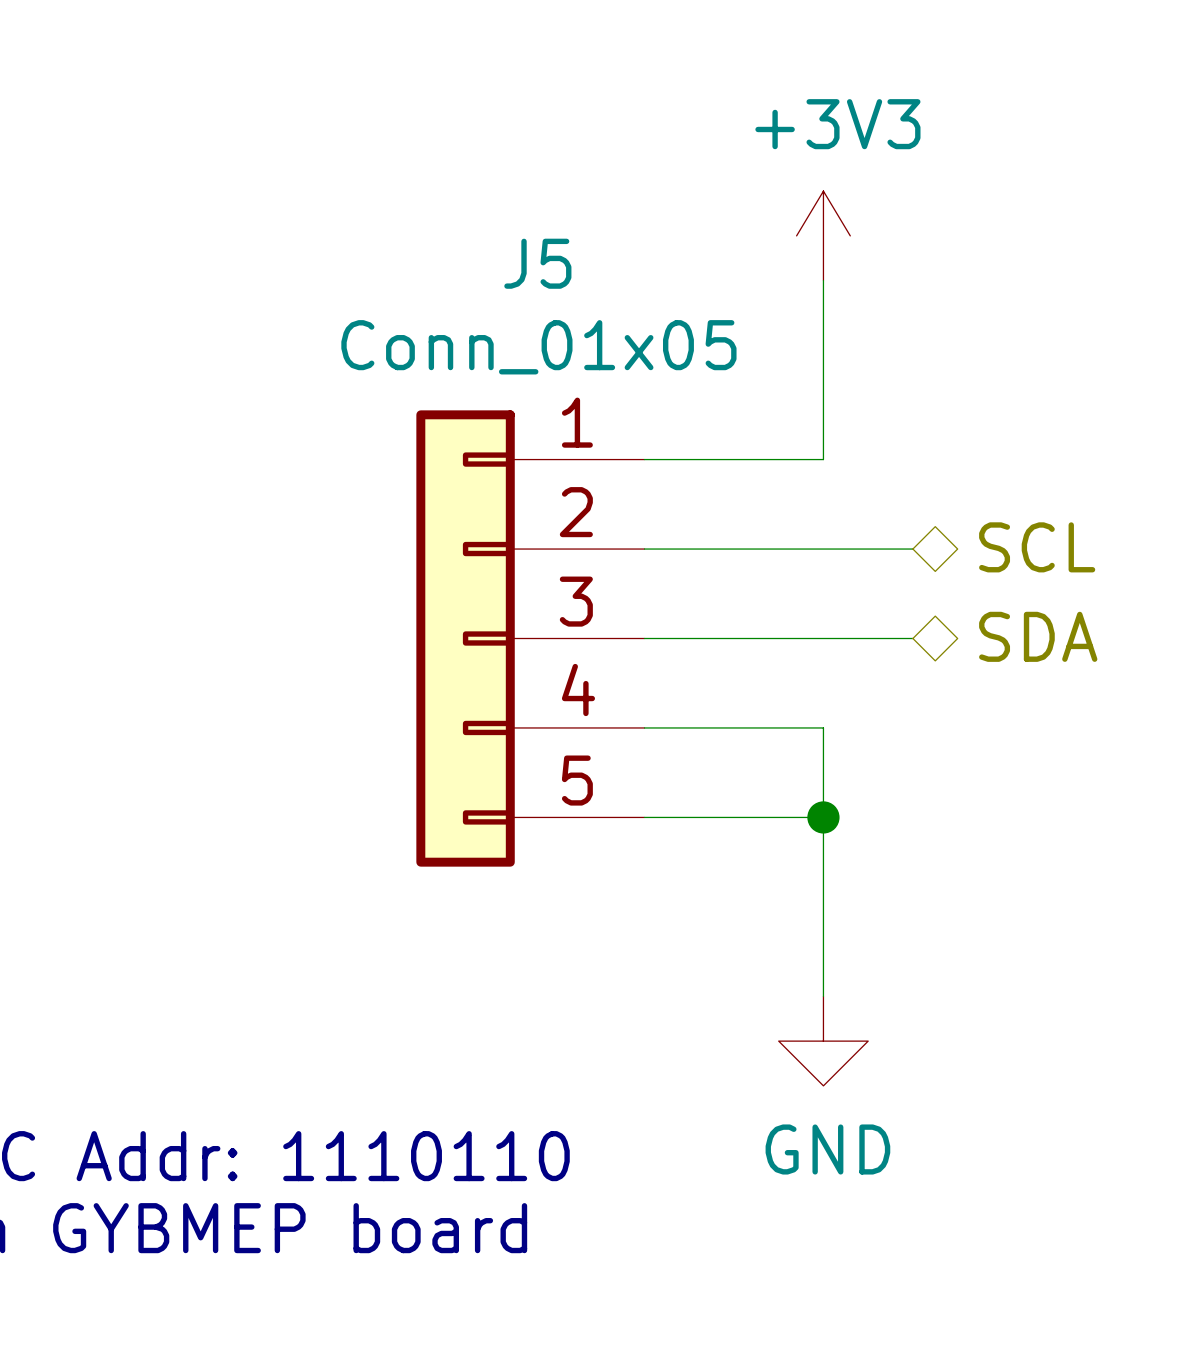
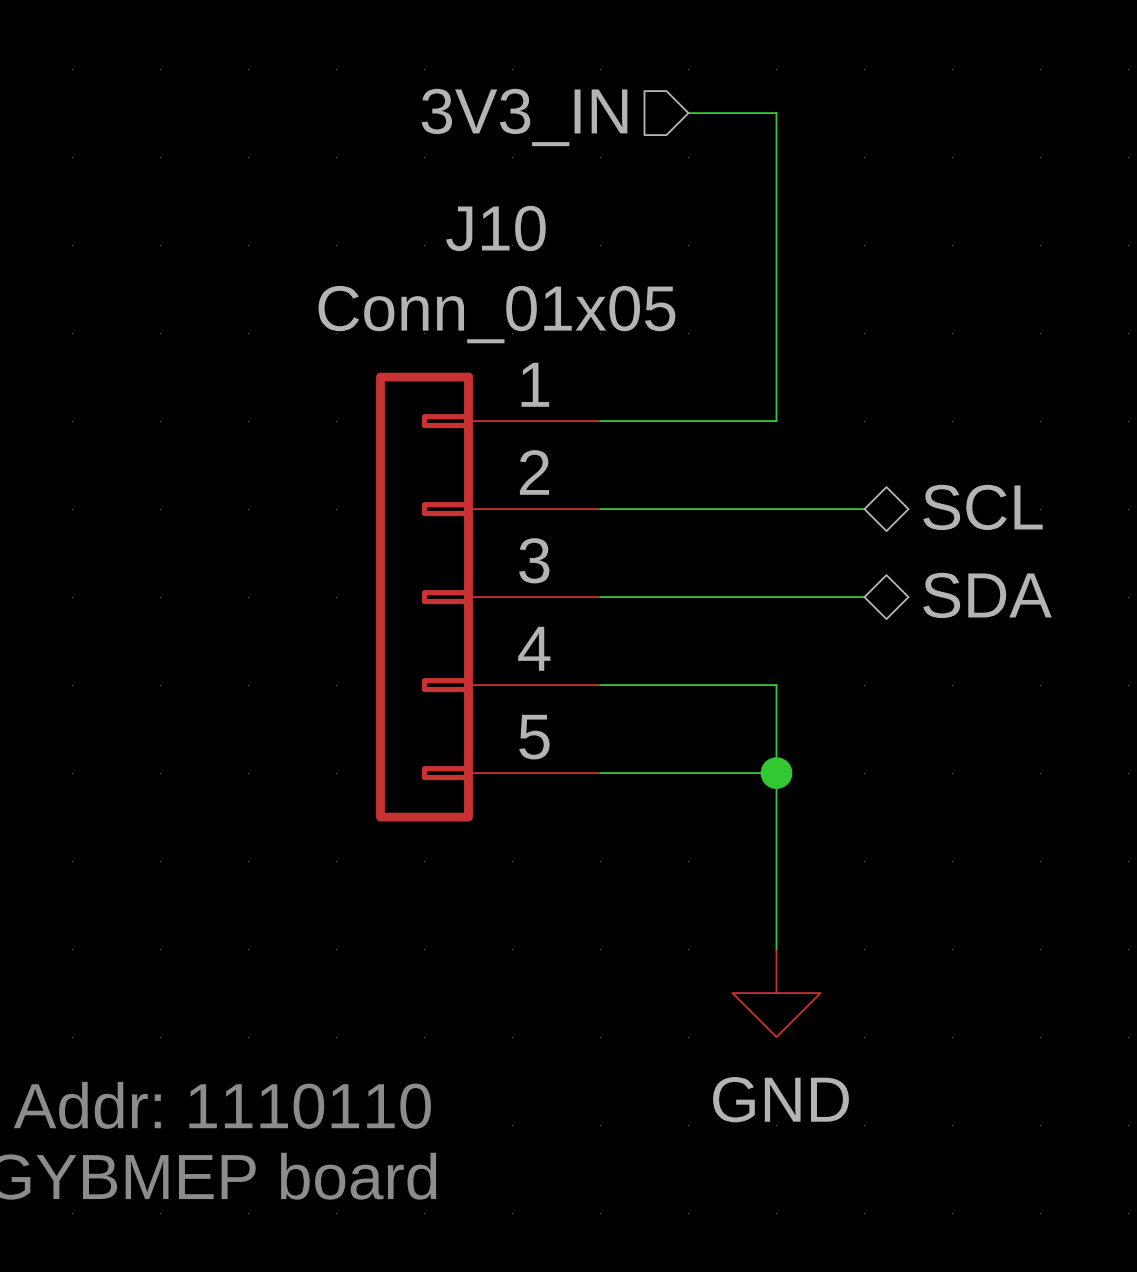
hierarchical label: none -> 3V3_IN (524, 117)
wire: none -> (688, 113) (776, 113) (776, 245)
power symbol: +3V3 (823, 235) -> none
J5 name: J5 (537, 263) -> J10 (495, 228)

